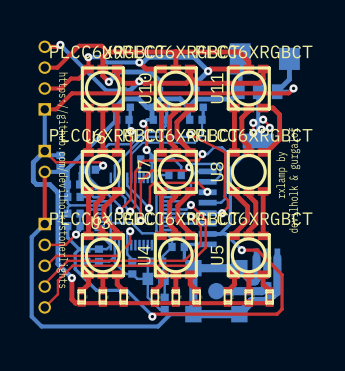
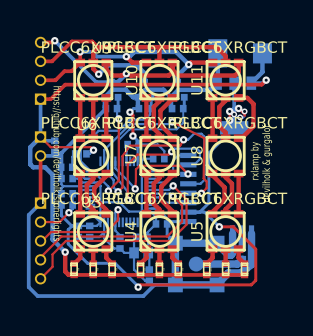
via: none -> (244, 111)
via: none -> (234, 114)
via: (269, 127) -> none
via: (261, 129) -> none
via: none -> (240, 117)

